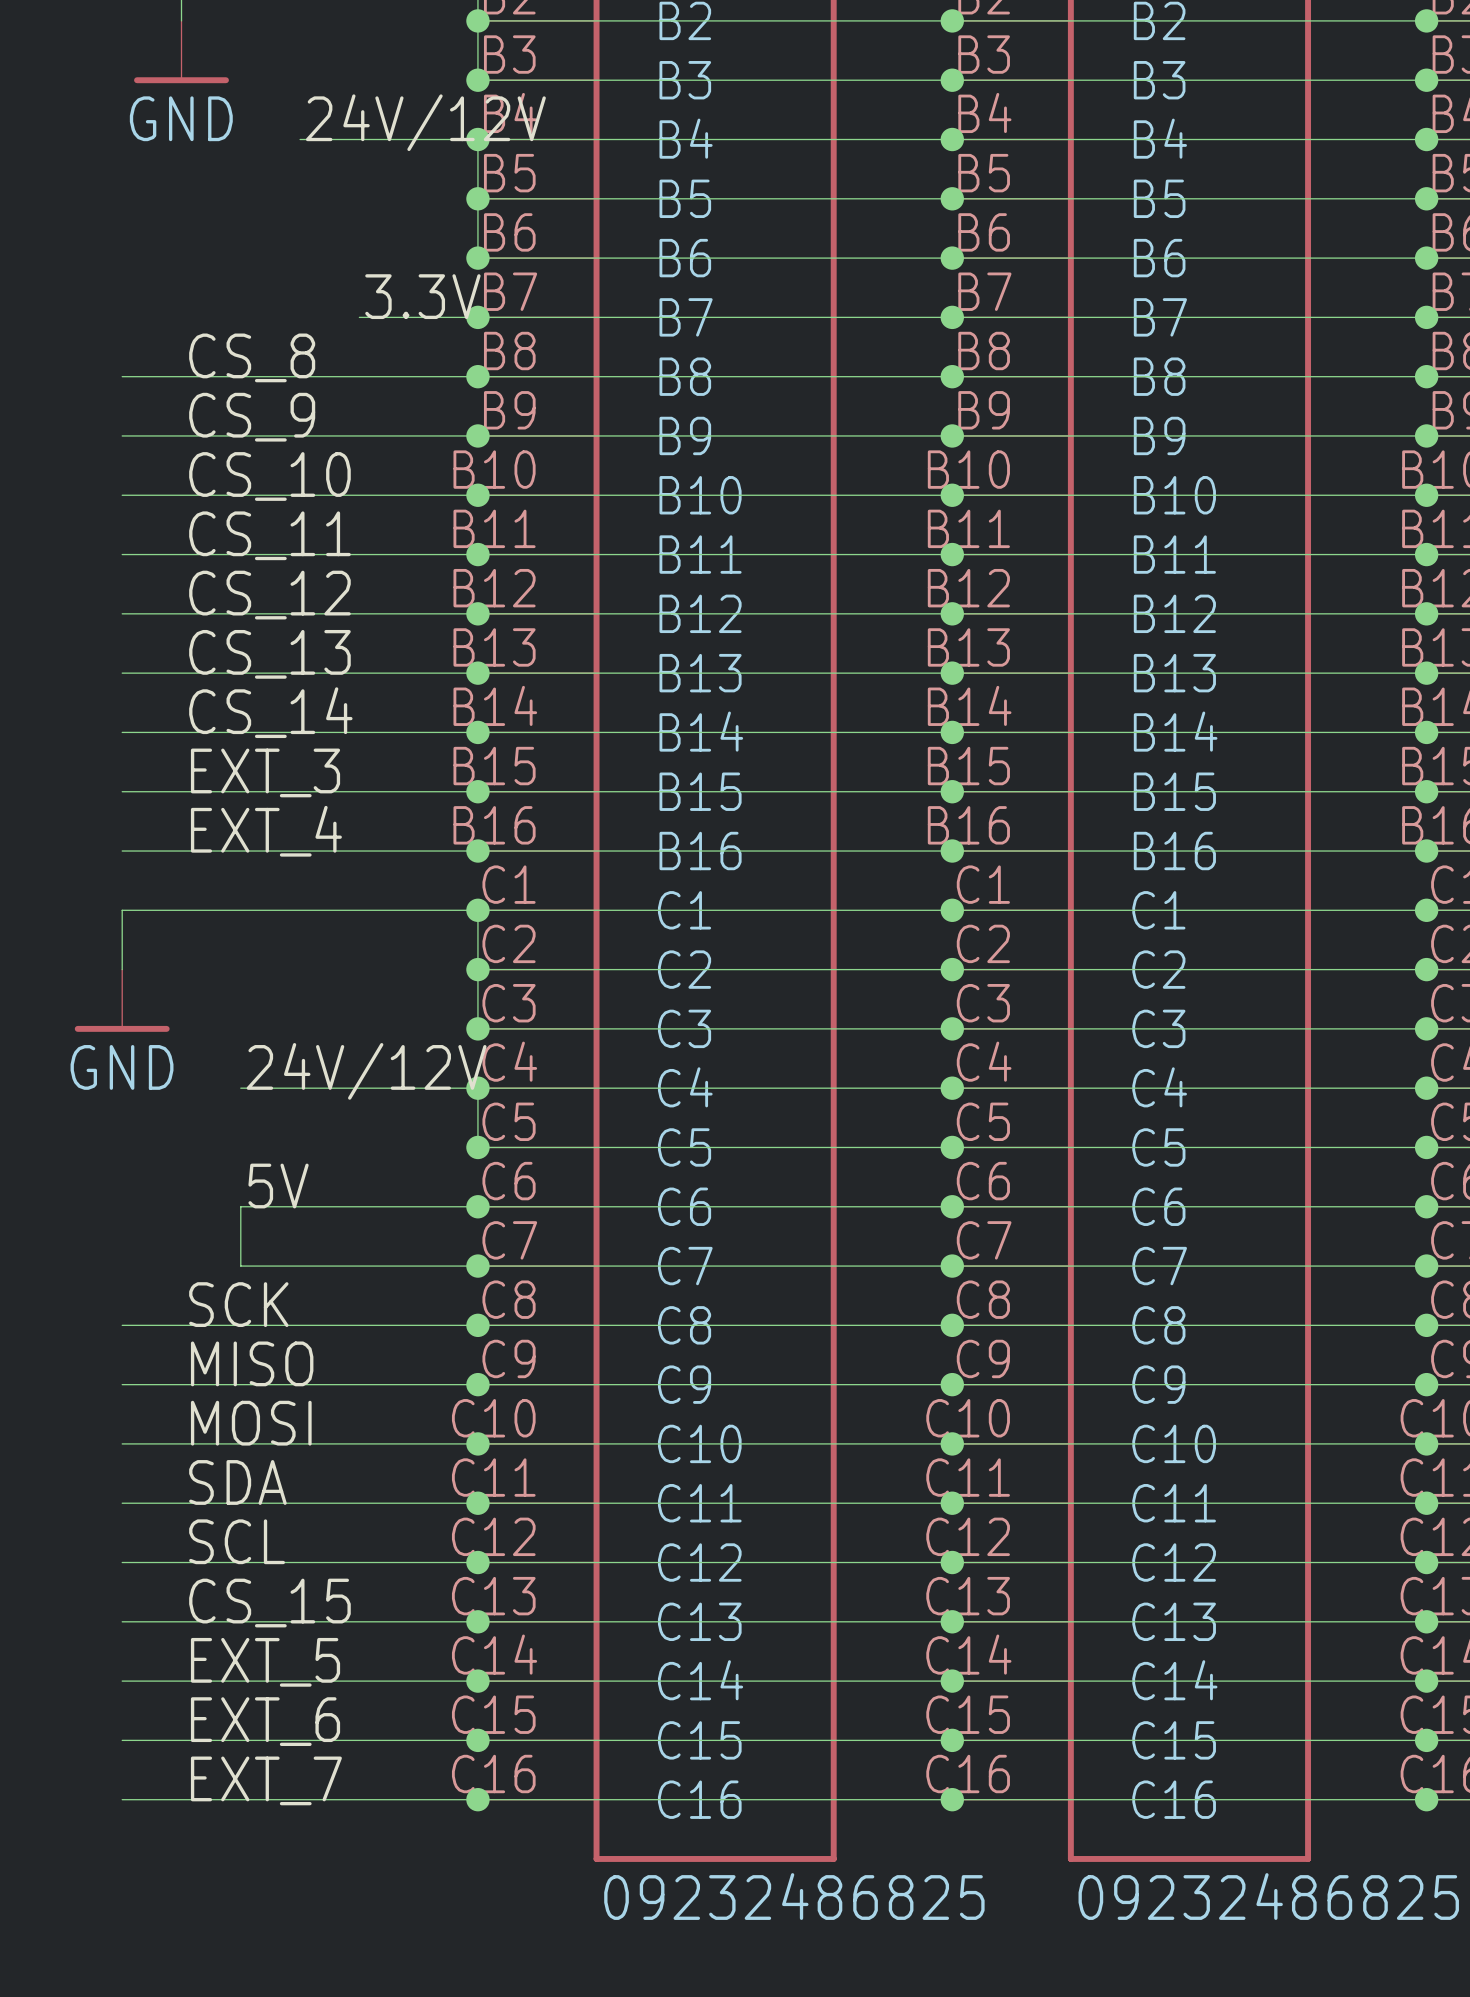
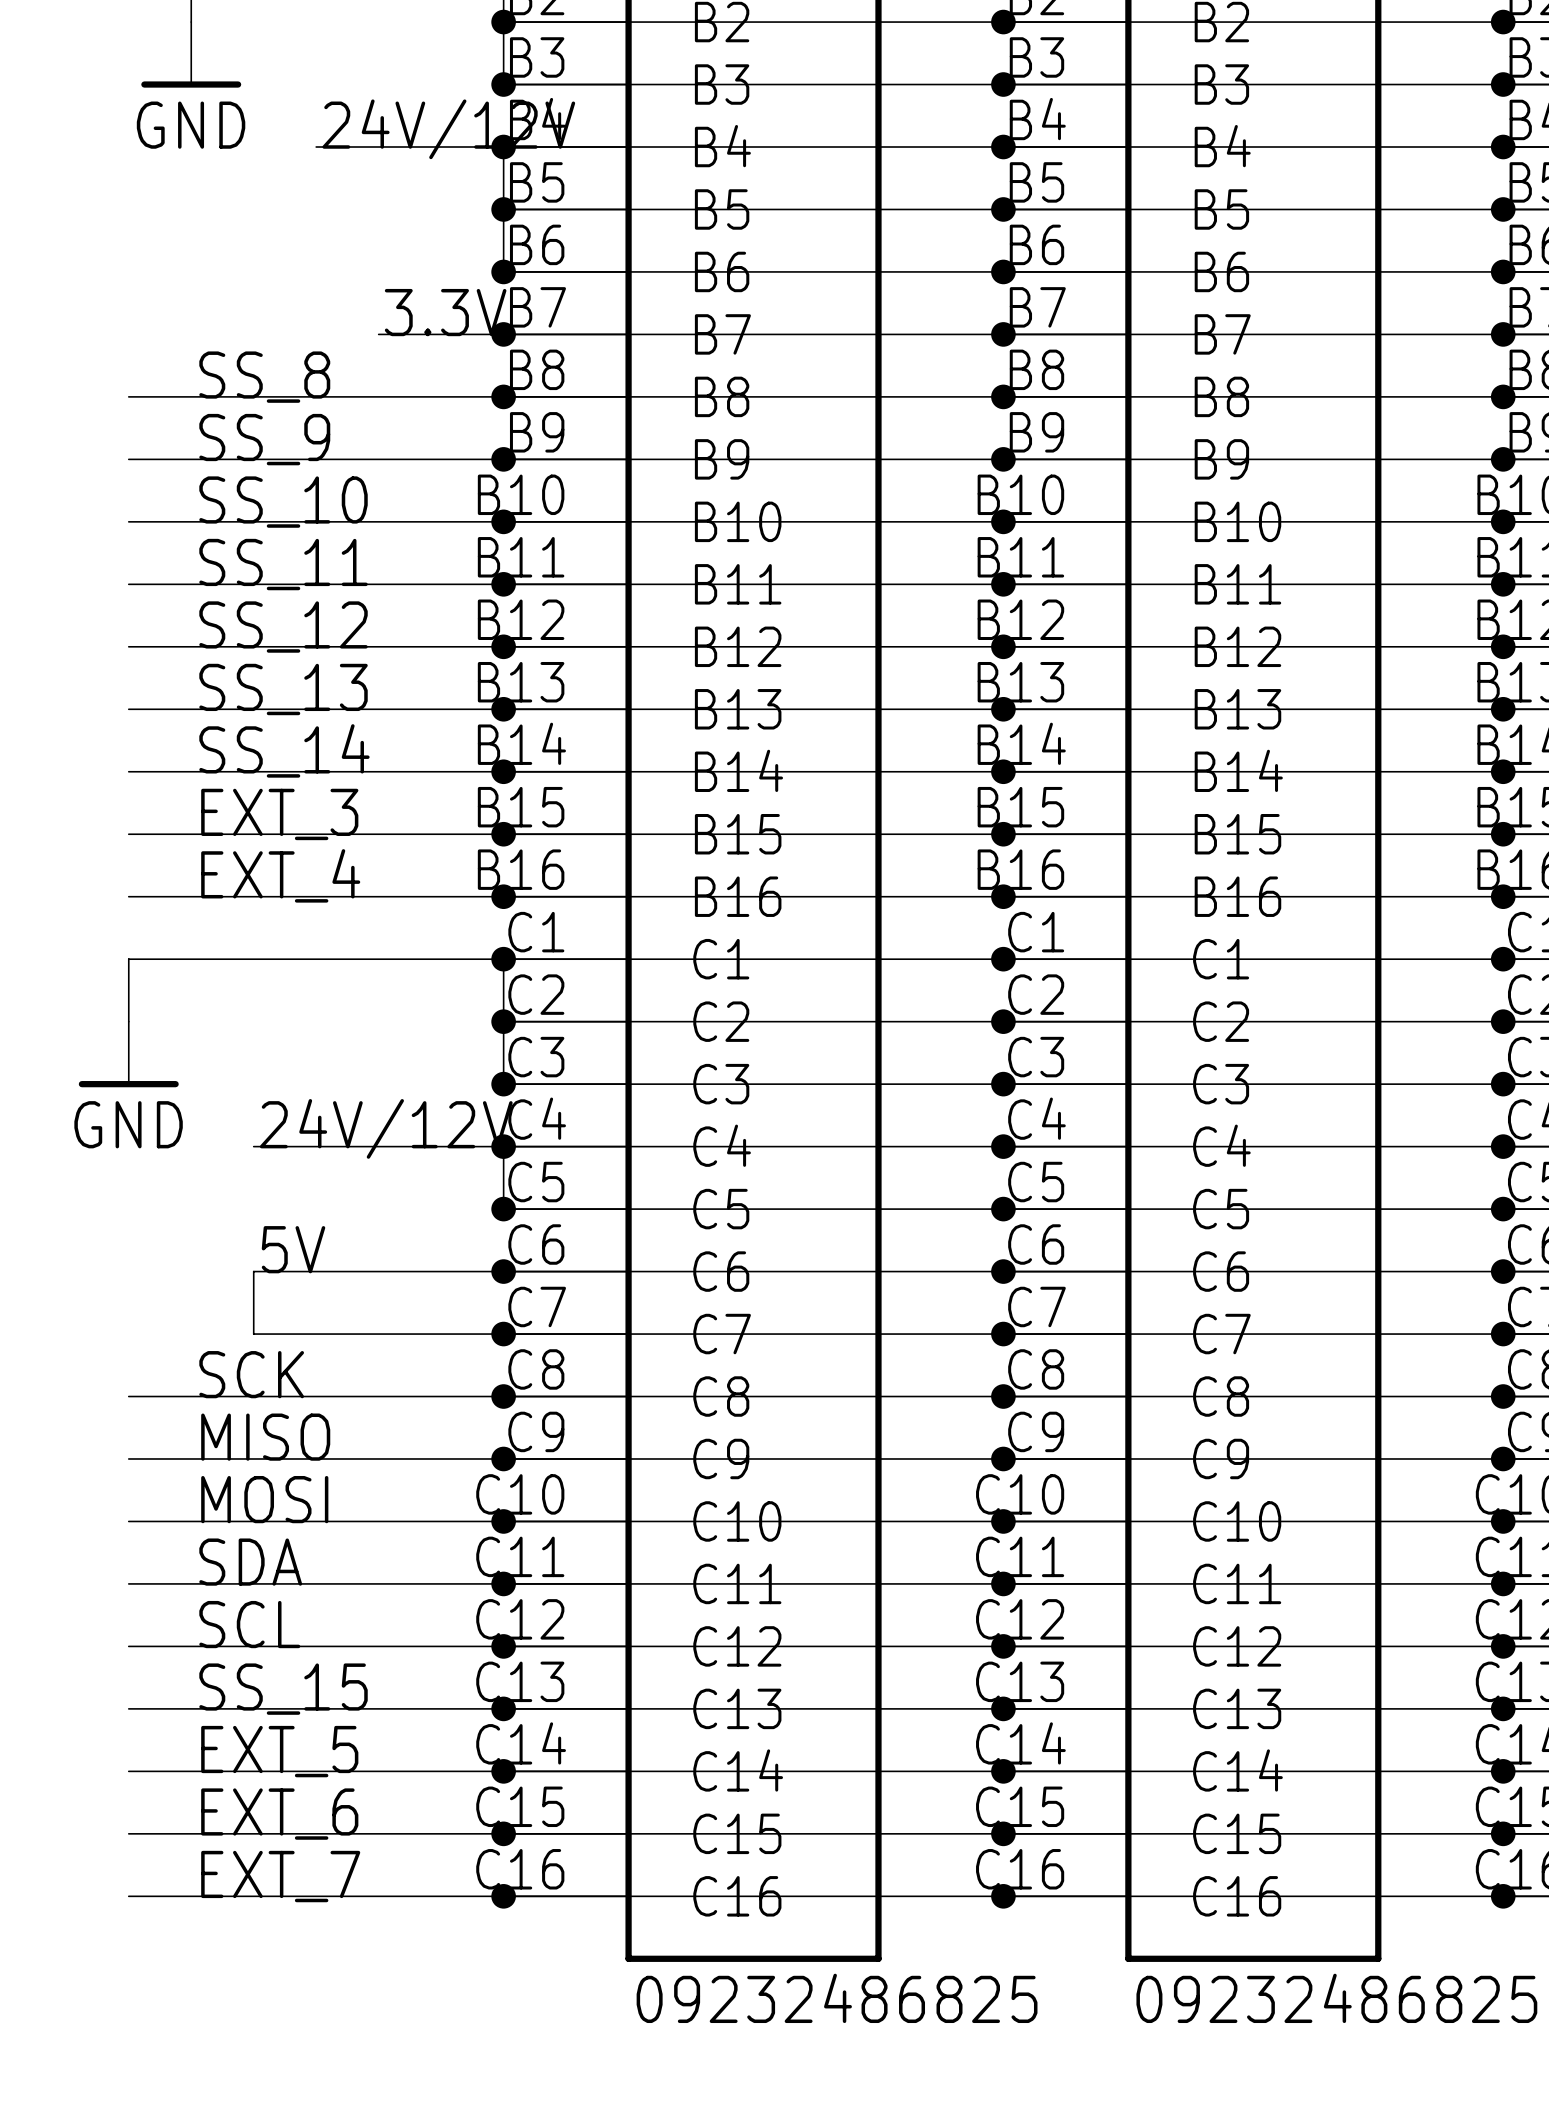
label: CS_8 (252, 357) -> SS_8 (264, 377)
label: CS_9 (252, 417) -> SS_9 (264, 439)
label: CS_10 (269, 476) -> SS_10 (283, 502)
label: CS_11 (269, 535) -> SS_11 (283, 564)
label: CS_12 (269, 595) -> SS_12 (283, 627)
label: CS_13 (269, 654) -> SS_13 (283, 689)
label: CS_14 (270, 712) -> SS_14 (284, 750)
label: CS_15 (269, 1603) -> SS_15 (283, 1689)

